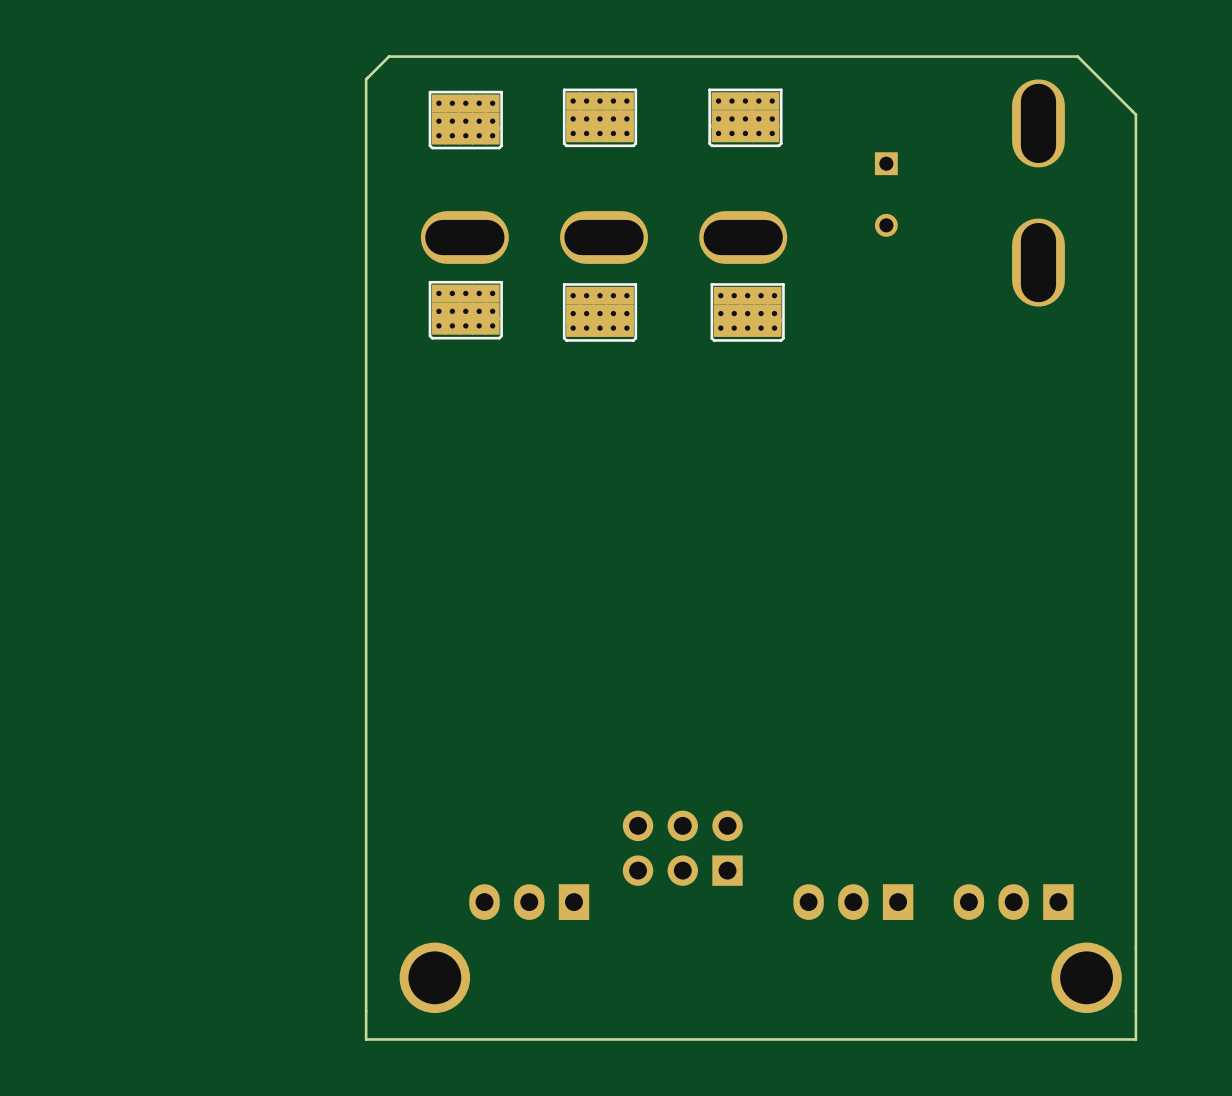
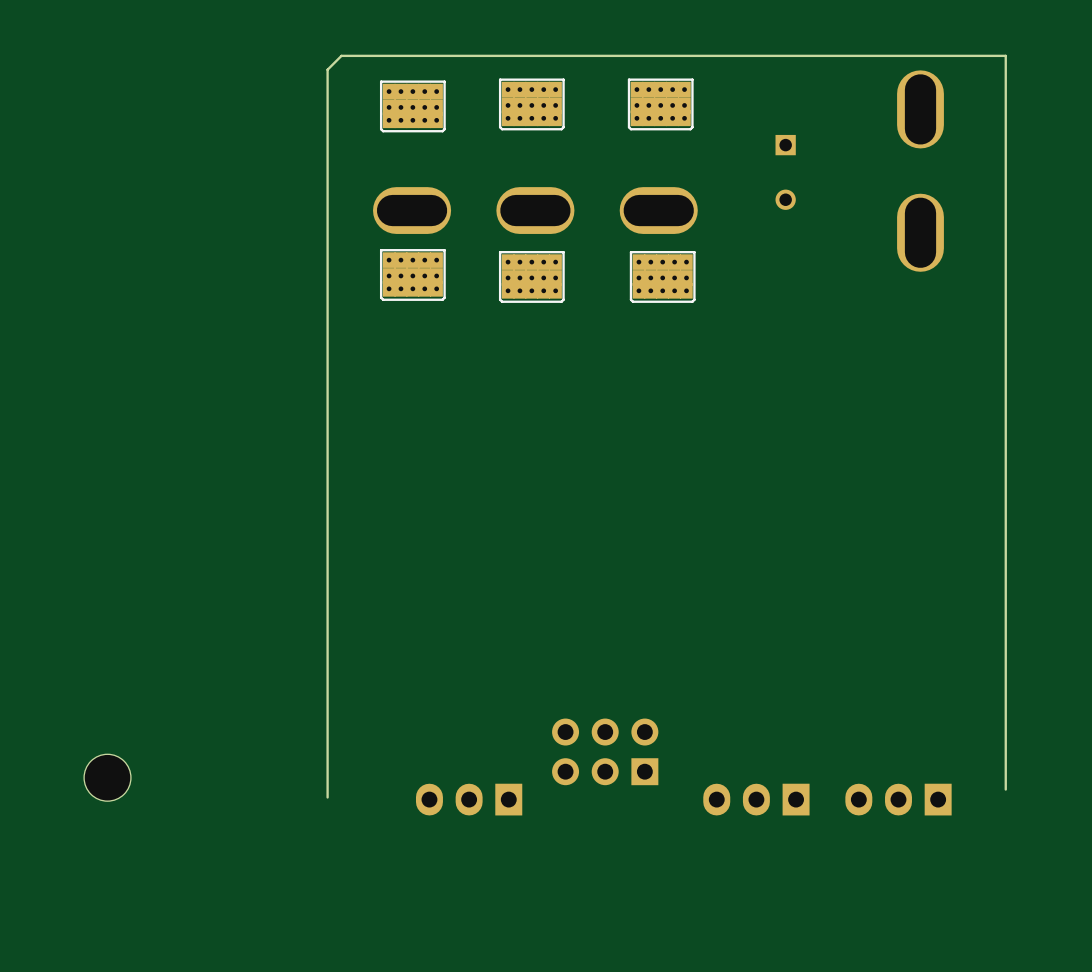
board edge: (1077, 56) (1135, 114) (1135, 1039) (366, 1039) (366, 79) (389, 56) (1077, 56) -> none
part: none -> (107, 777)
board edge: none -> (1005, 789) (1005, 55) (341, 55) (327, 69) (327, 797)
part: (434, 977) -> none
part: (1086, 977) -> none

